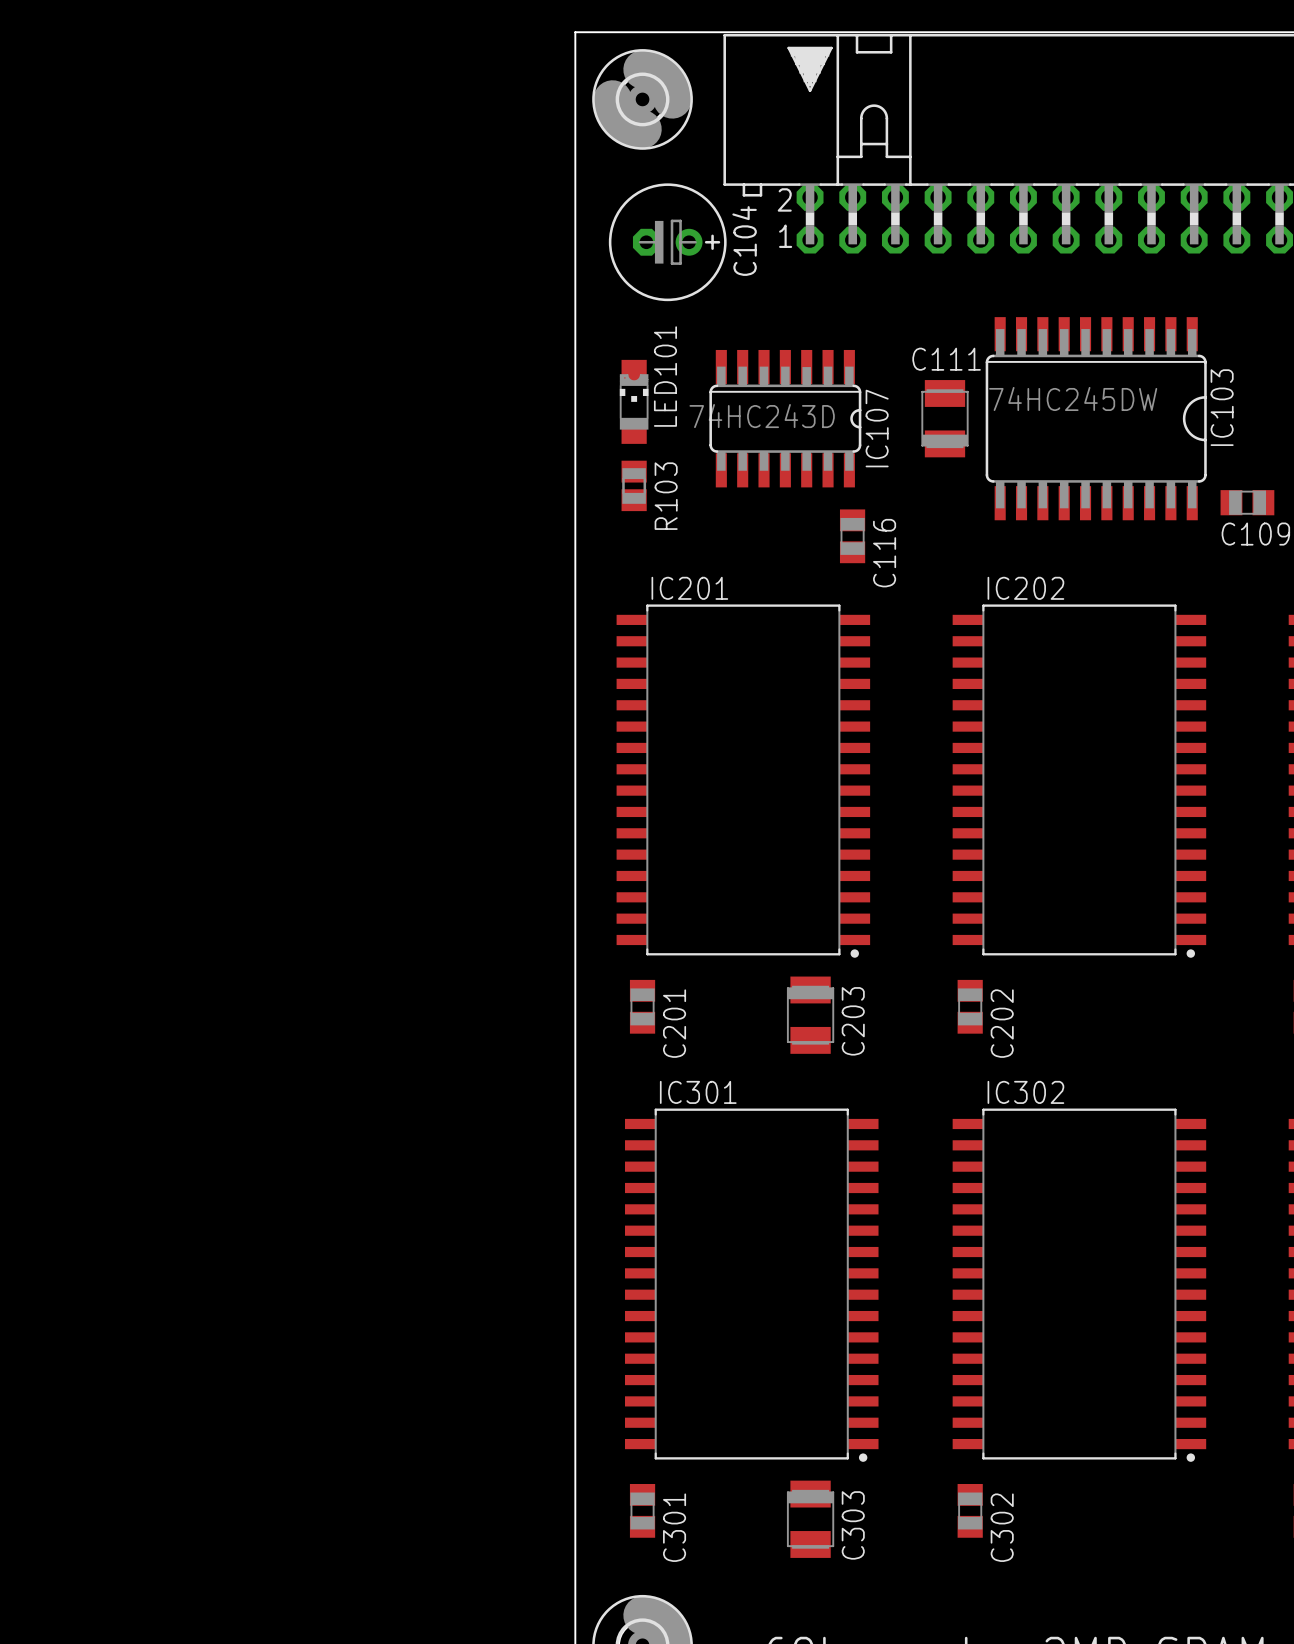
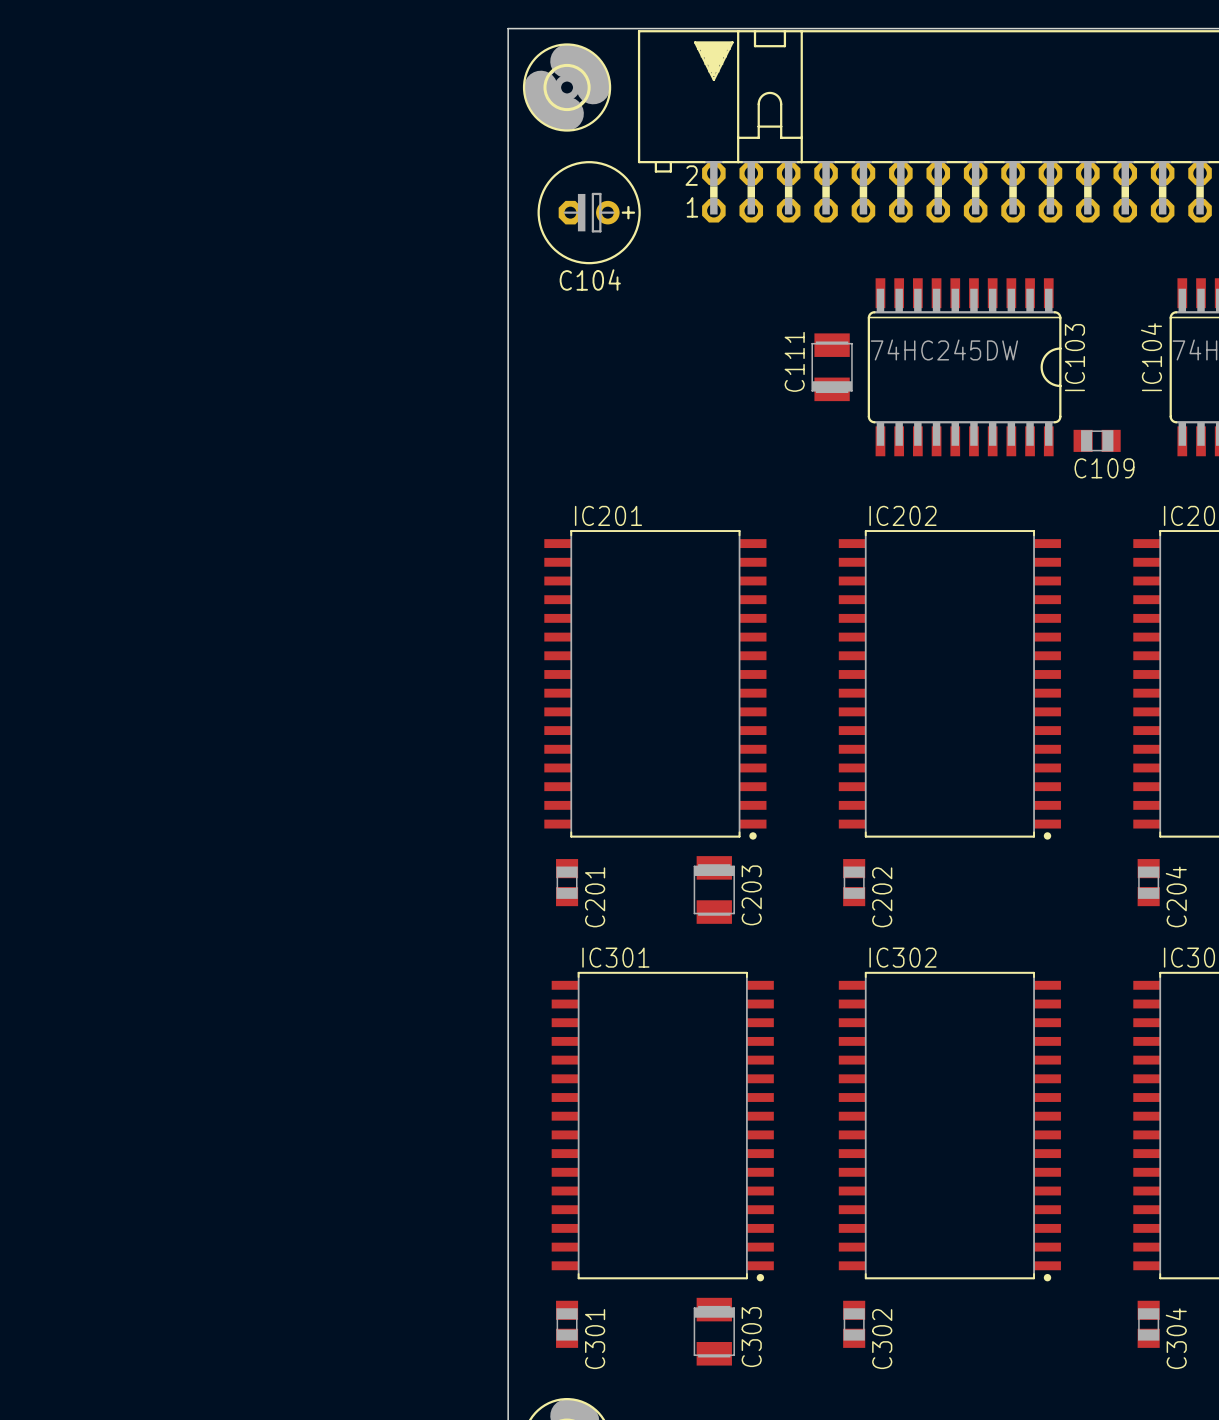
C104 name rotation: 0° (744, 240) -> 90° clockwise (590, 279)
C104 name position: C104 (744, 240) -> C104 (590, 279)
C111 name rotation: 0° (946, 359) -> 90° counterclockwise (794, 361)
LED101: (634, 401) -> none
IC107: 74HC243D (785, 418) -> none
R103: (634, 485) -> none
C116: (852, 536) -> none

